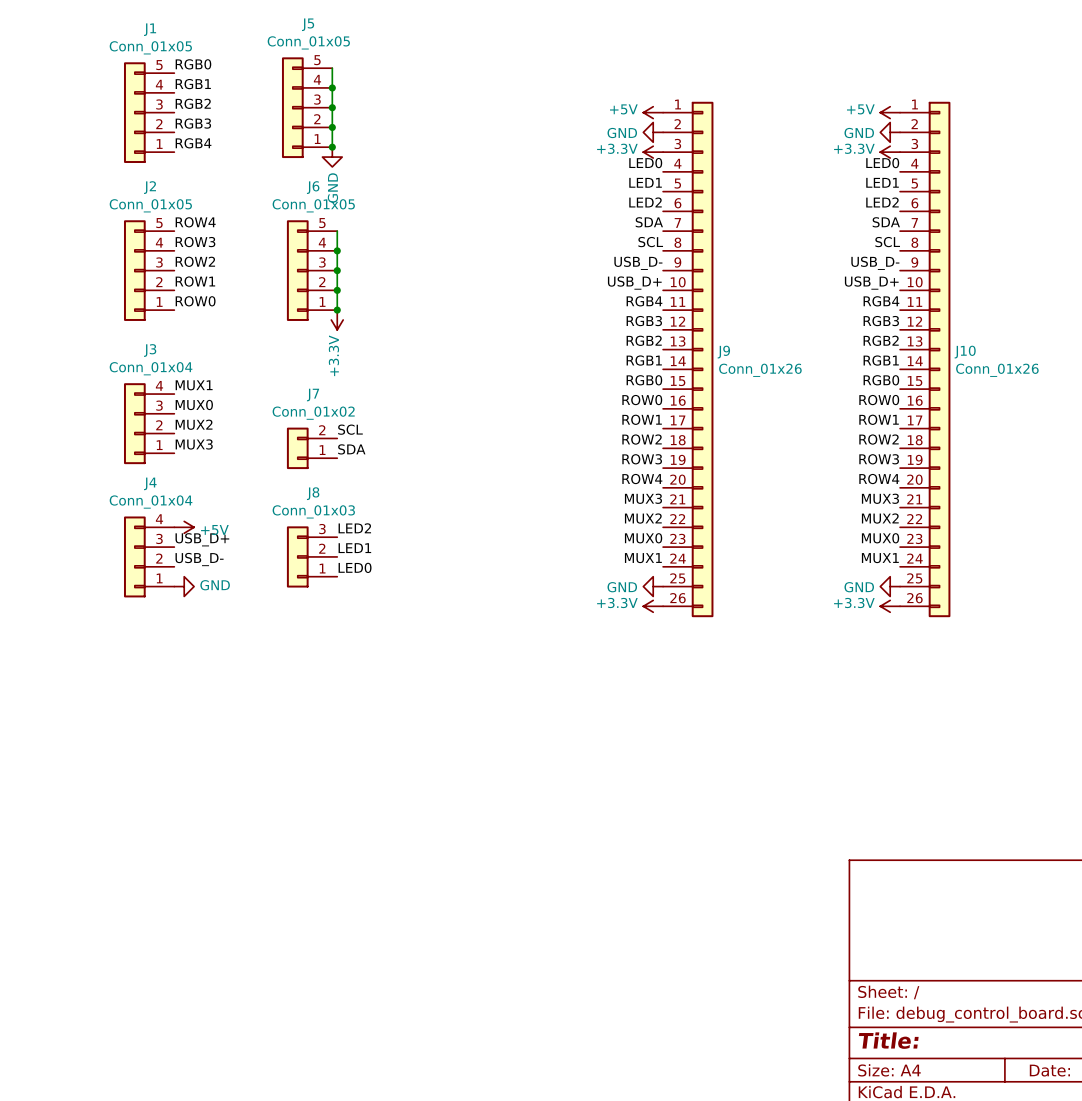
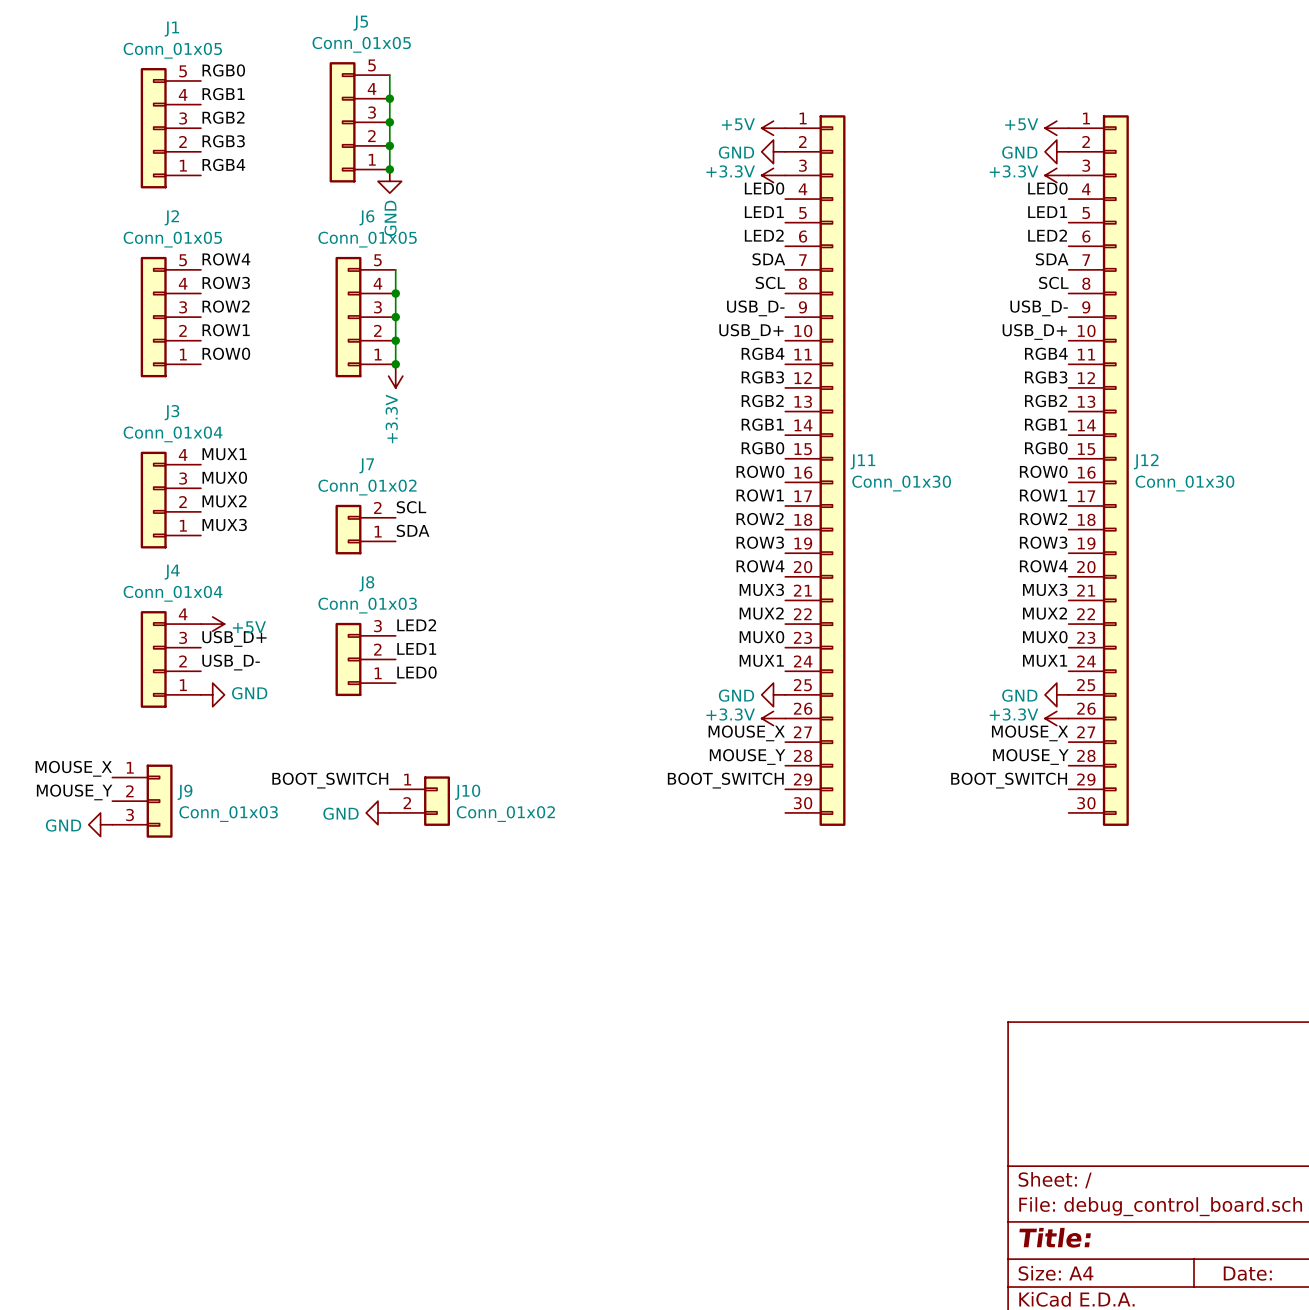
J9 symbol: [663, 101, 714, 618] -> [112, 764, 173, 838]
J10 symbol: [900, 101, 951, 618] -> [389, 776, 451, 826]
J9 value: Conn_01x26 (760, 370) -> Conn_01x03 (228, 814)
J10 value: Conn_01x26 (997, 370) -> Conn_01x02 (505, 814)
J11: none -> Conn_01x30 (815, 470)
J12: none -> Conn_01x30 (1098, 470)
label: none -> MOUSE_X (746, 733)
label: none -> MOUSE_X (1030, 733)
label: none -> MOUSE_Y (747, 756)
label: none -> MOUSE_Y (1030, 756)
label: none -> MOUSE_X (73, 768)
label: none -> BOOT_SWITCH (330, 780)
label: none -> BOOT_SWITCH (725, 780)
label: none -> BOOT_SWITCH (1009, 780)
label: none -> MOUSE_Y (74, 792)
power symbol: none -> GND (378, 812)
power symbol: none -> GND (100, 824)

